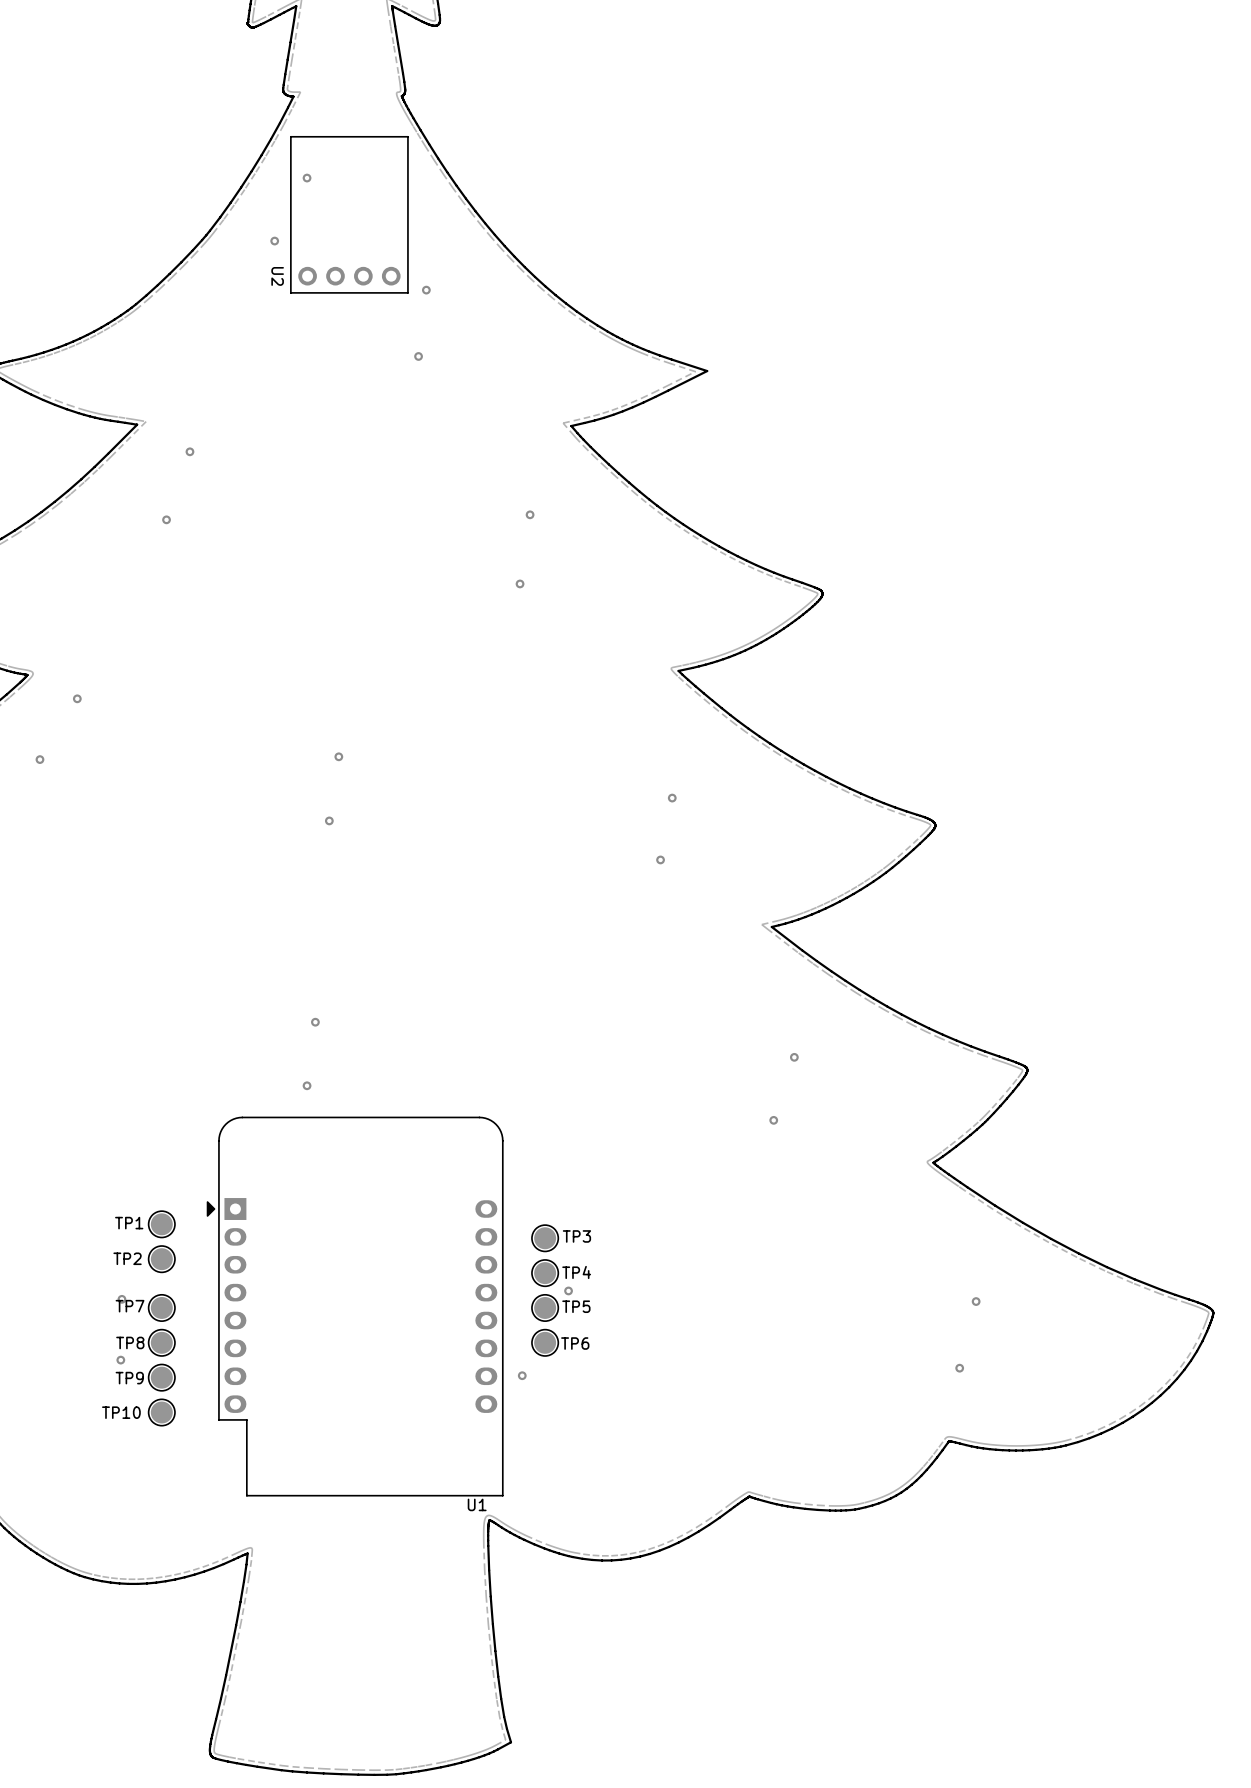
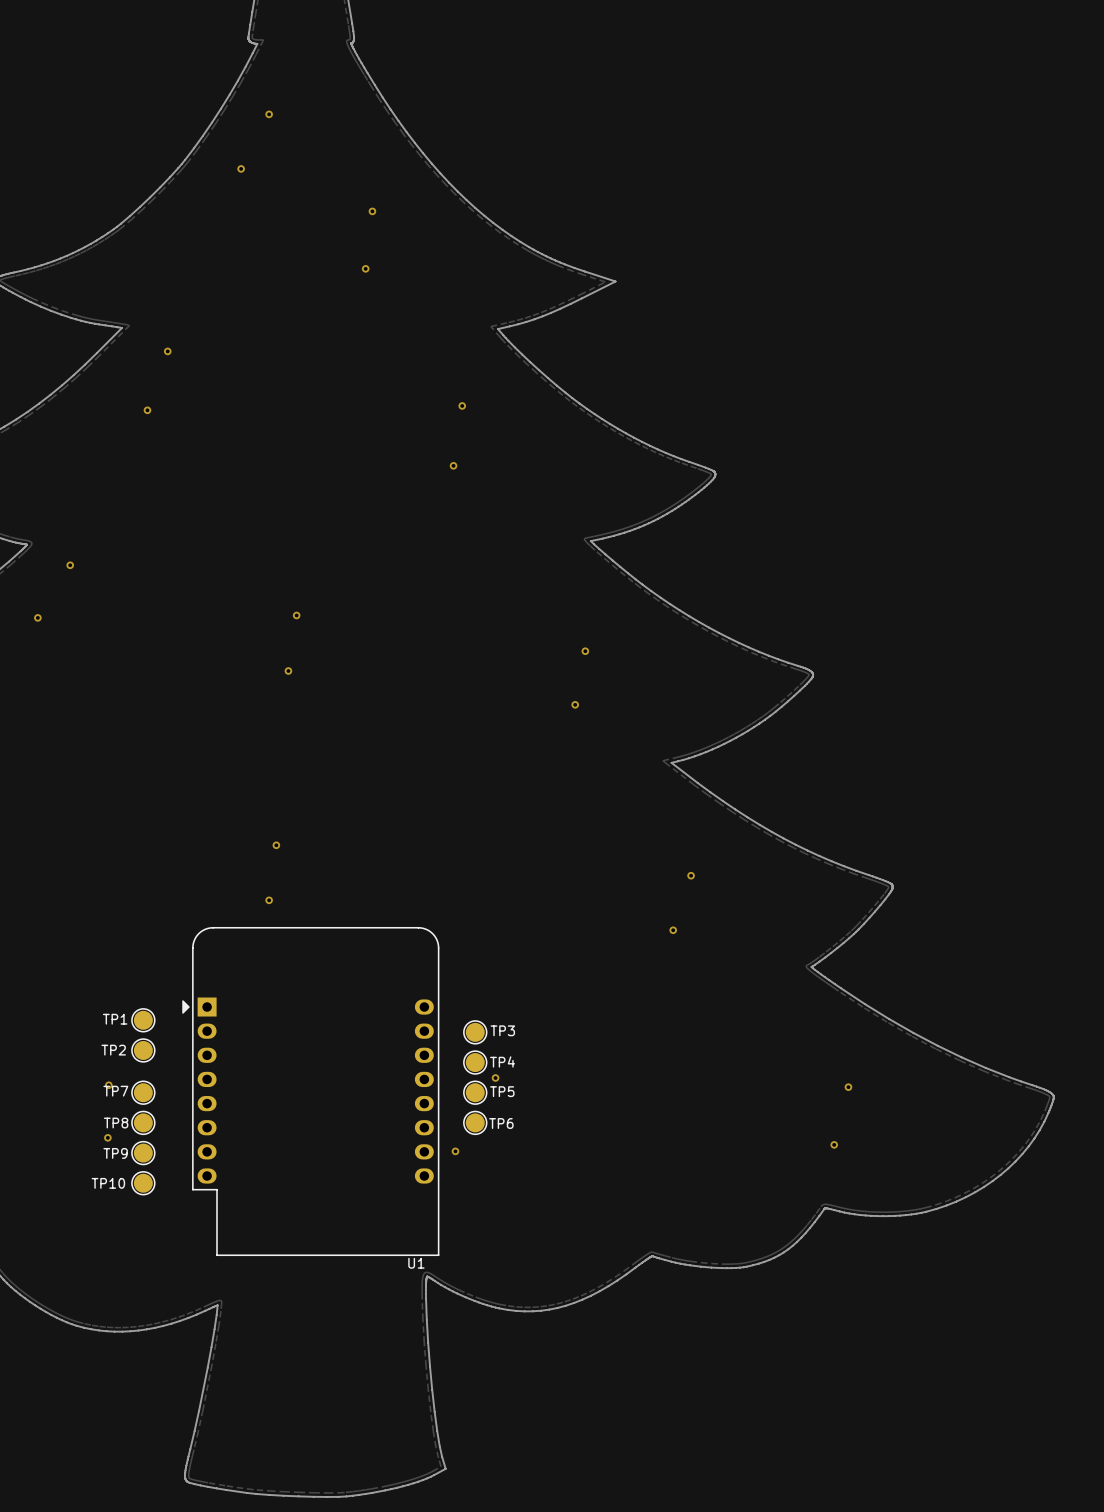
U2: (349, 214) -> none

